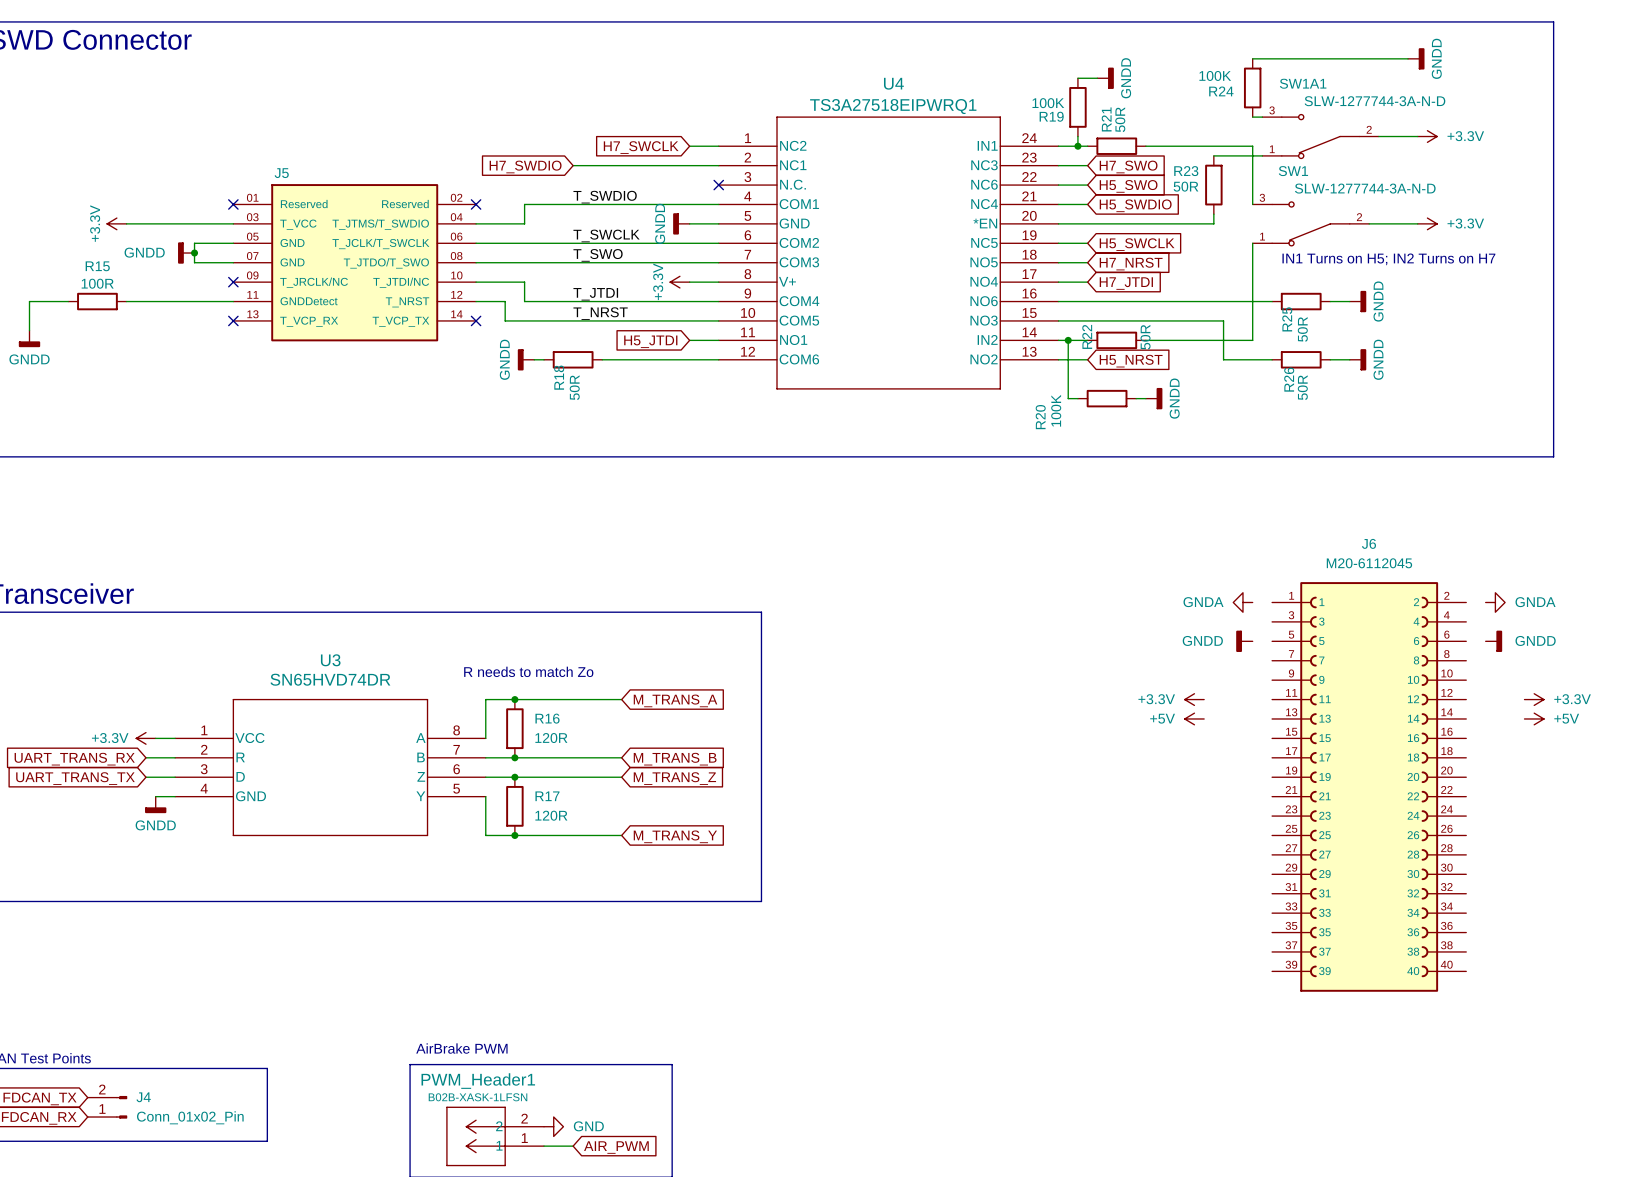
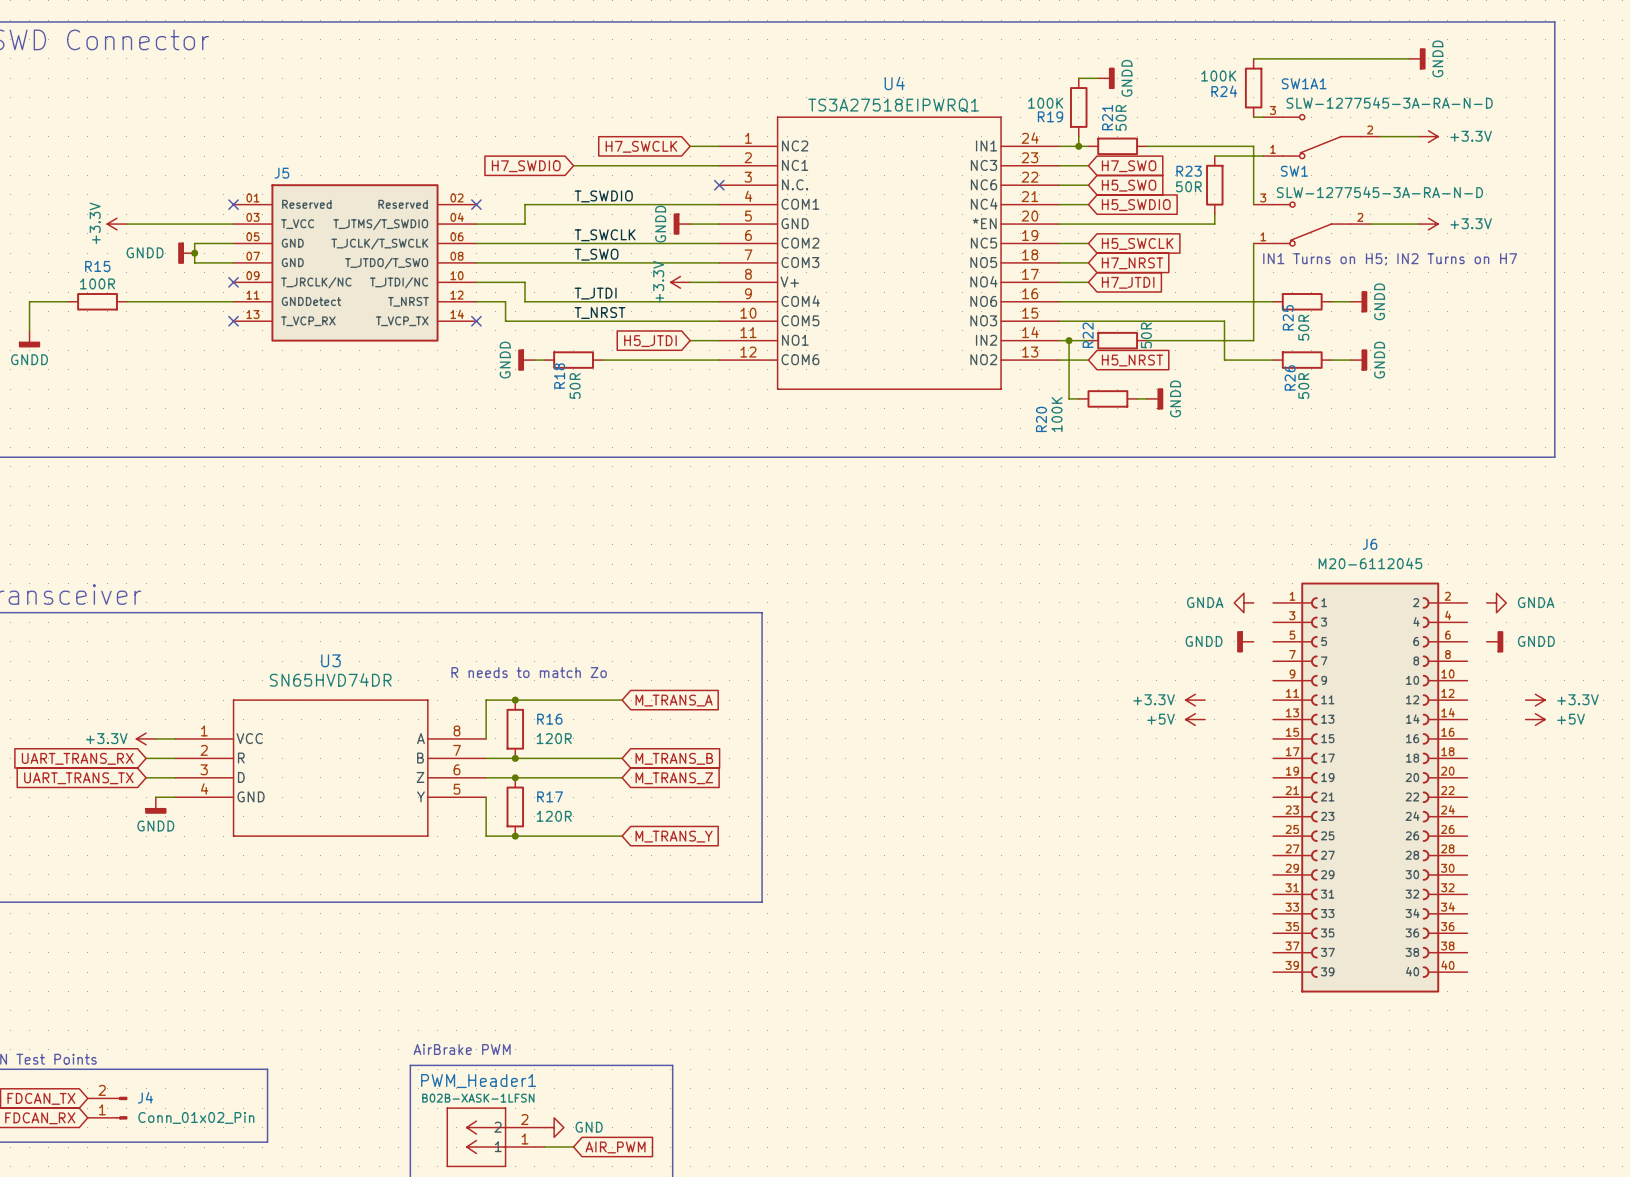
SW1A1 value: SLW-1277744-3A-N-D (1374, 101) -> SLW-1277545-3A-RA-N-D (1389, 102)
SW1 value: SLW-1277744-3A-N-D (1365, 188) -> SLW-1277545-3A-RA-N-D (1379, 192)

